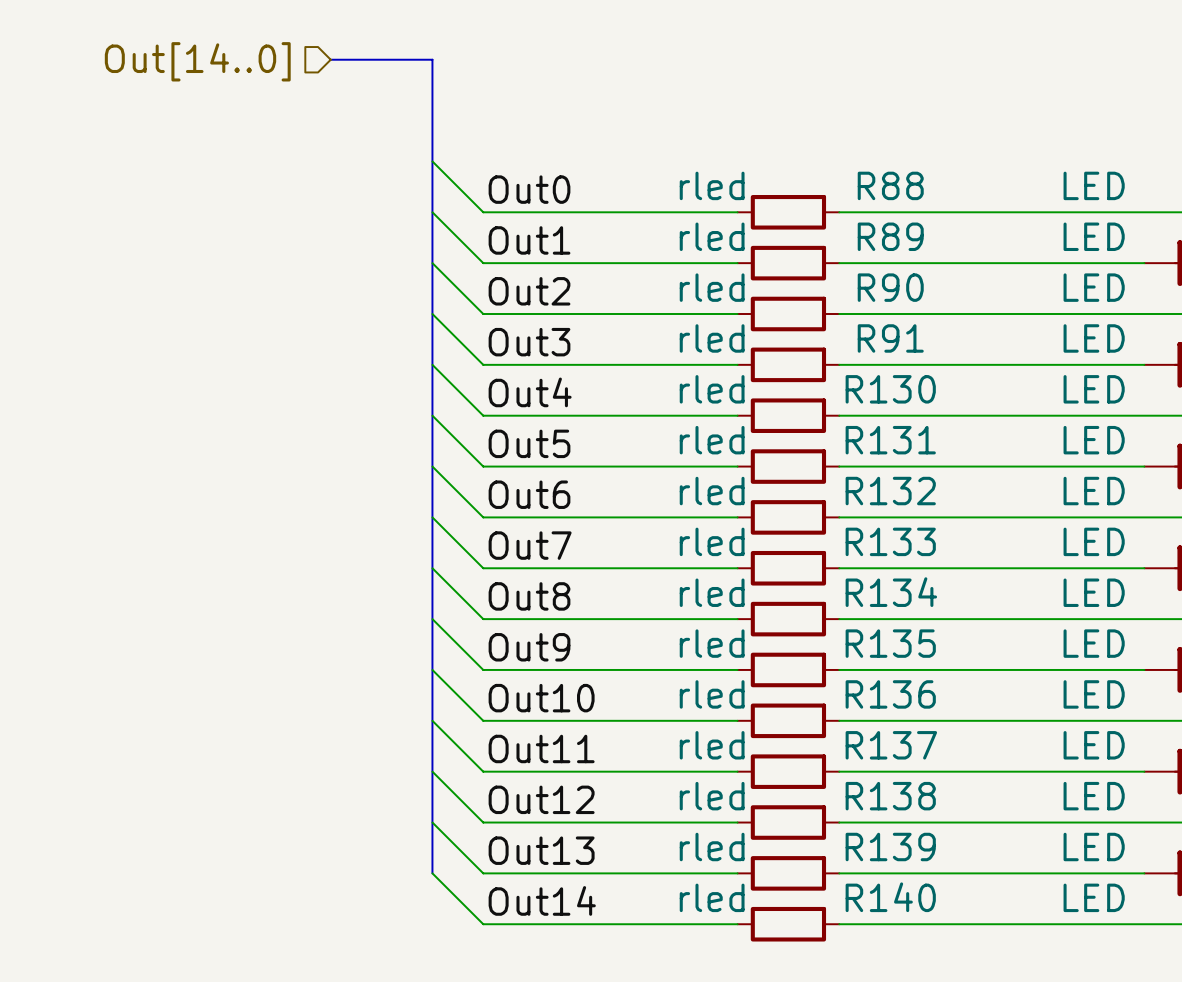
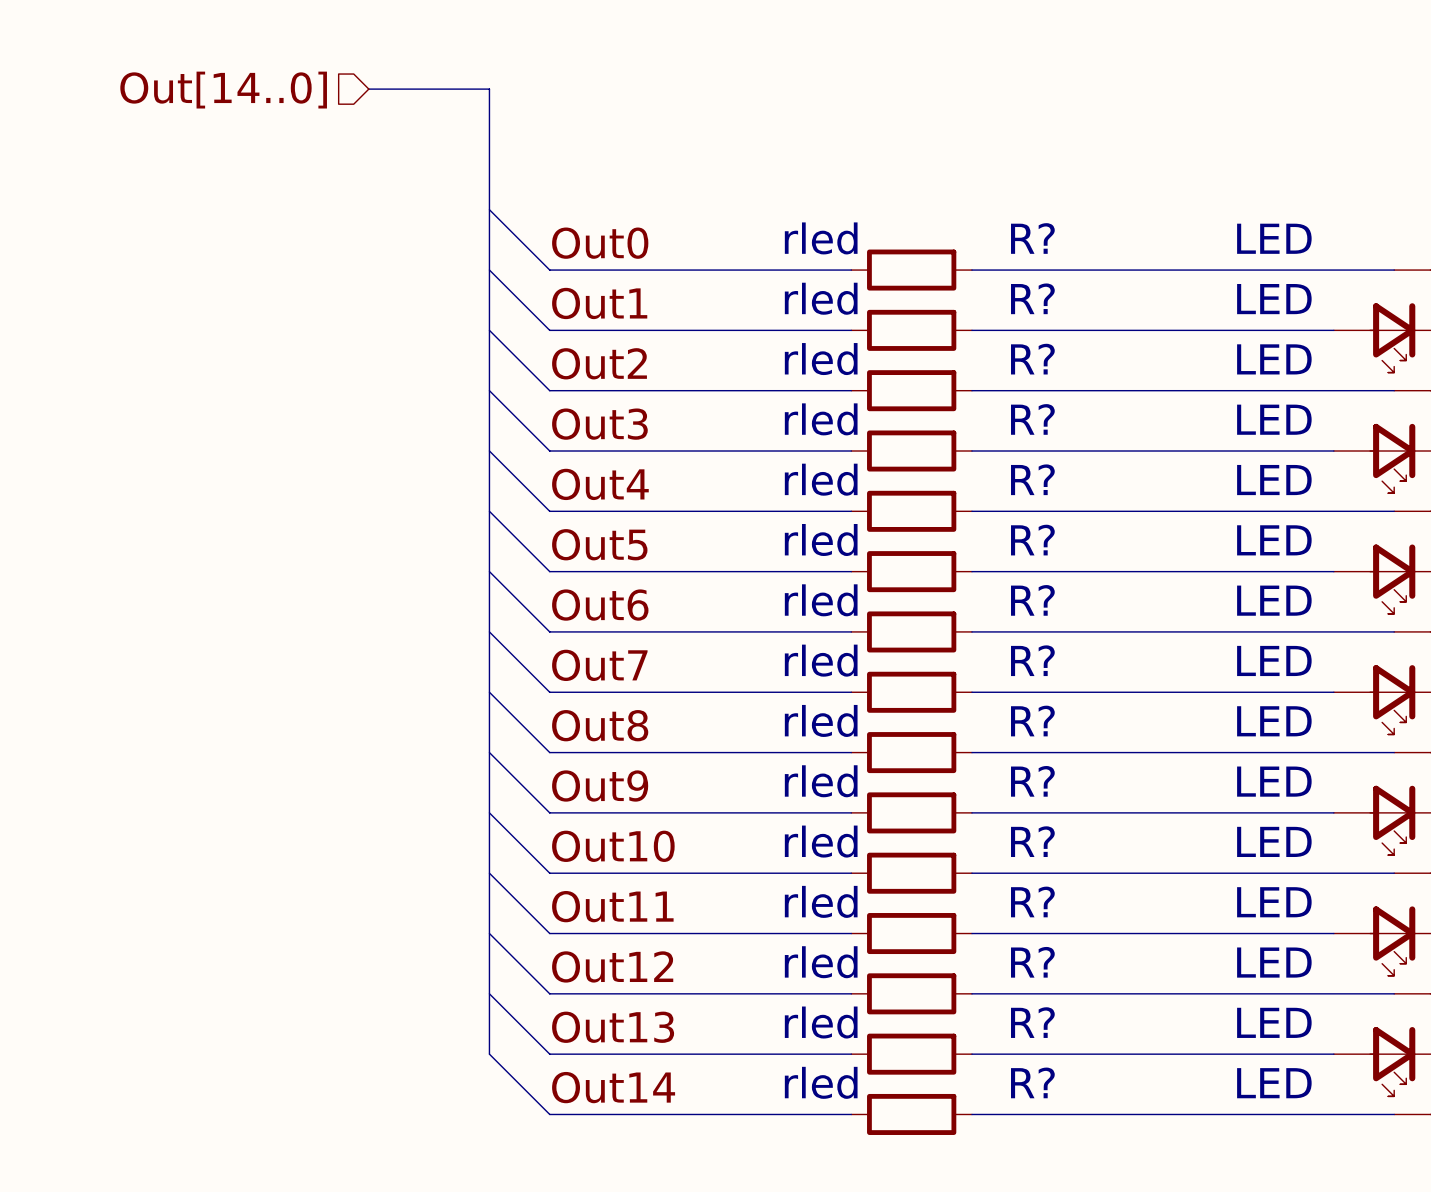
R88 name: R88 (890, 185) -> R? (1032, 238)
R89 name: R89 (890, 236) -> R? (1032, 298)
R90 name: R90 (890, 287) -> R? (1032, 359)
R91 name: R91 (890, 338) -> R? (1032, 419)
R130 name: R130 (890, 389) -> R? (1032, 479)
R131 name: R131 (890, 440) -> R? (1032, 540)
R132 name: R132 (890, 491) -> R? (1032, 600)
R133 name: R133 (890, 541) -> R? (1032, 660)
R134 name: R134 (891, 592) -> R? (1032, 721)
R135 name: R135 (890, 643) -> R? (1032, 781)
R136 name: R136 (890, 694) -> R? (1032, 841)
R137 name: R137 (891, 745) -> R? (1032, 901)
R138 name: R138 (890, 796) -> R? (1032, 962)
R139 name: R139 (890, 847) -> R? (1032, 1022)
R140 name: R140 (890, 897) -> R? (1032, 1082)

